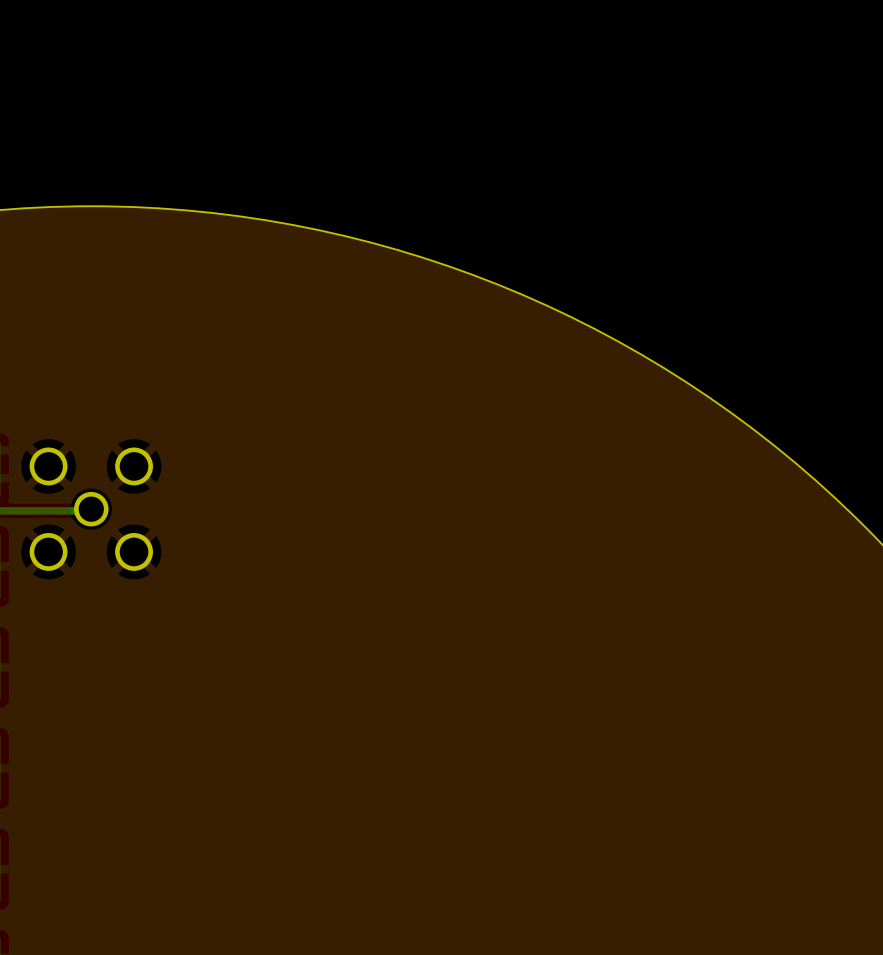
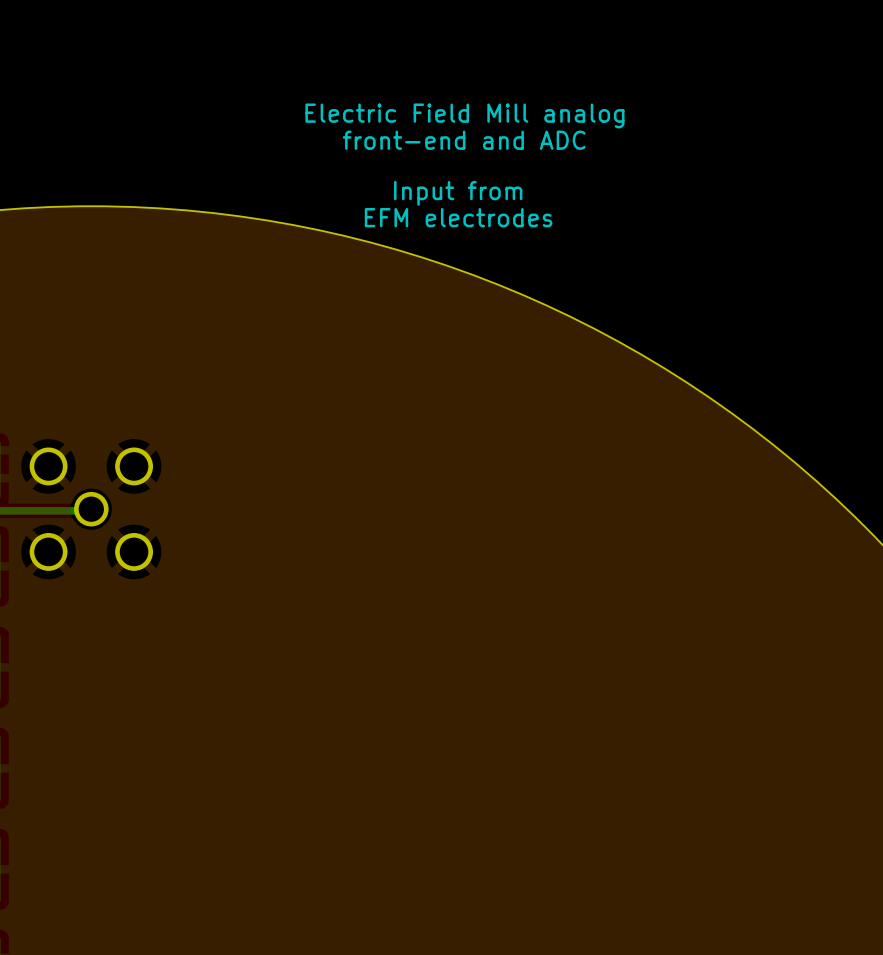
text: none -> Electric Field Mill analog (464, 115)
text: none -> front-end and ADC (464, 140)
text: none -> Input from (458, 193)
text: none -> EFM electrodes (458, 217)

